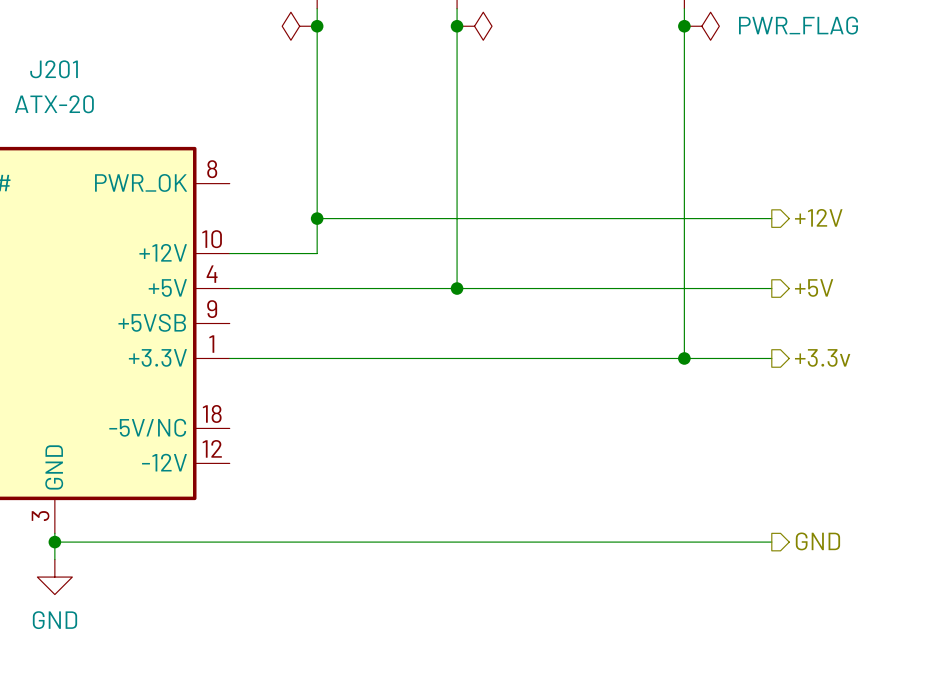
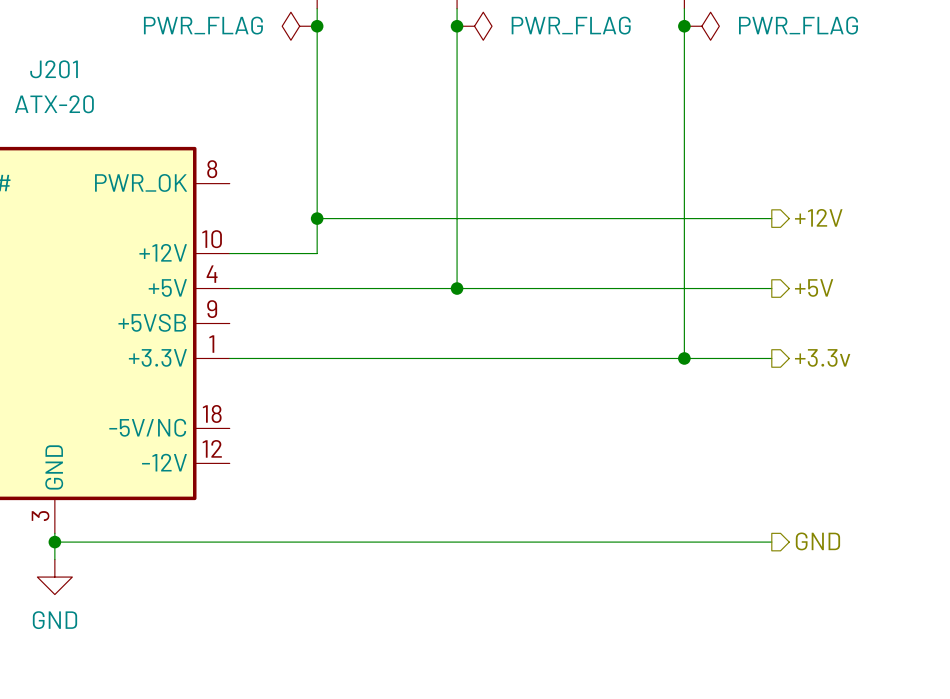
power symbol text: none -> PWR_FLAG (203, 25)
power symbol text: none -> PWR_FLAG (571, 25)

